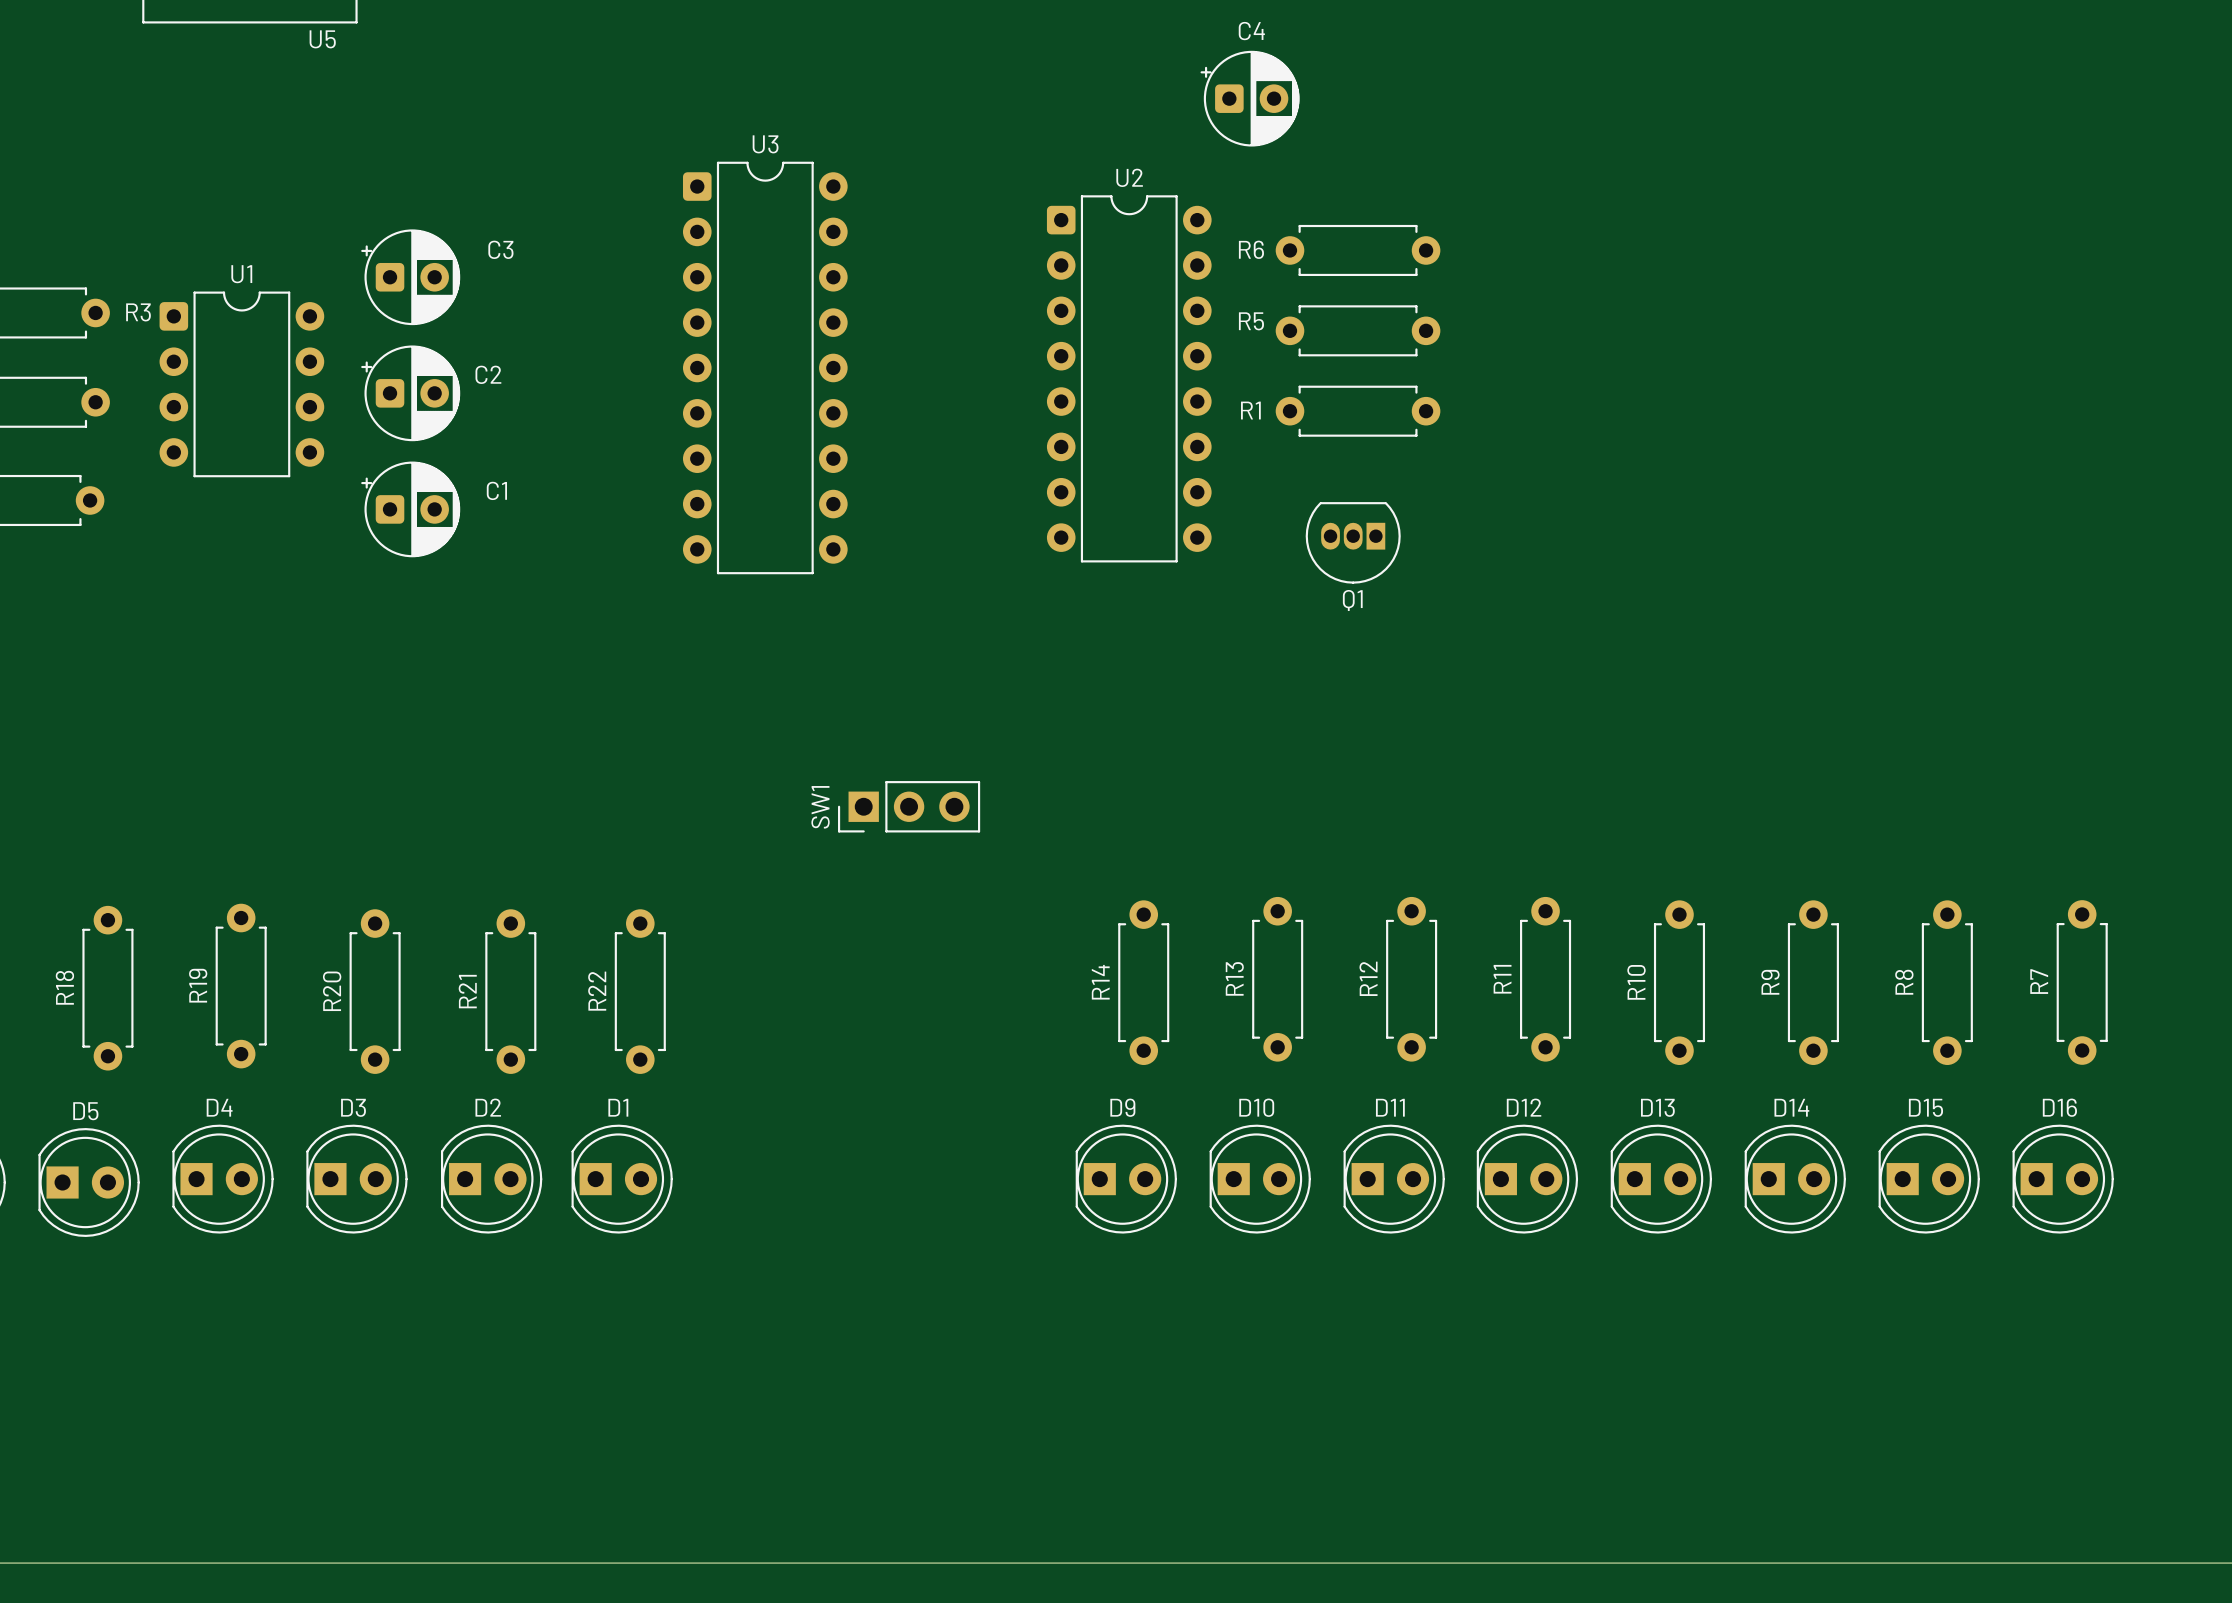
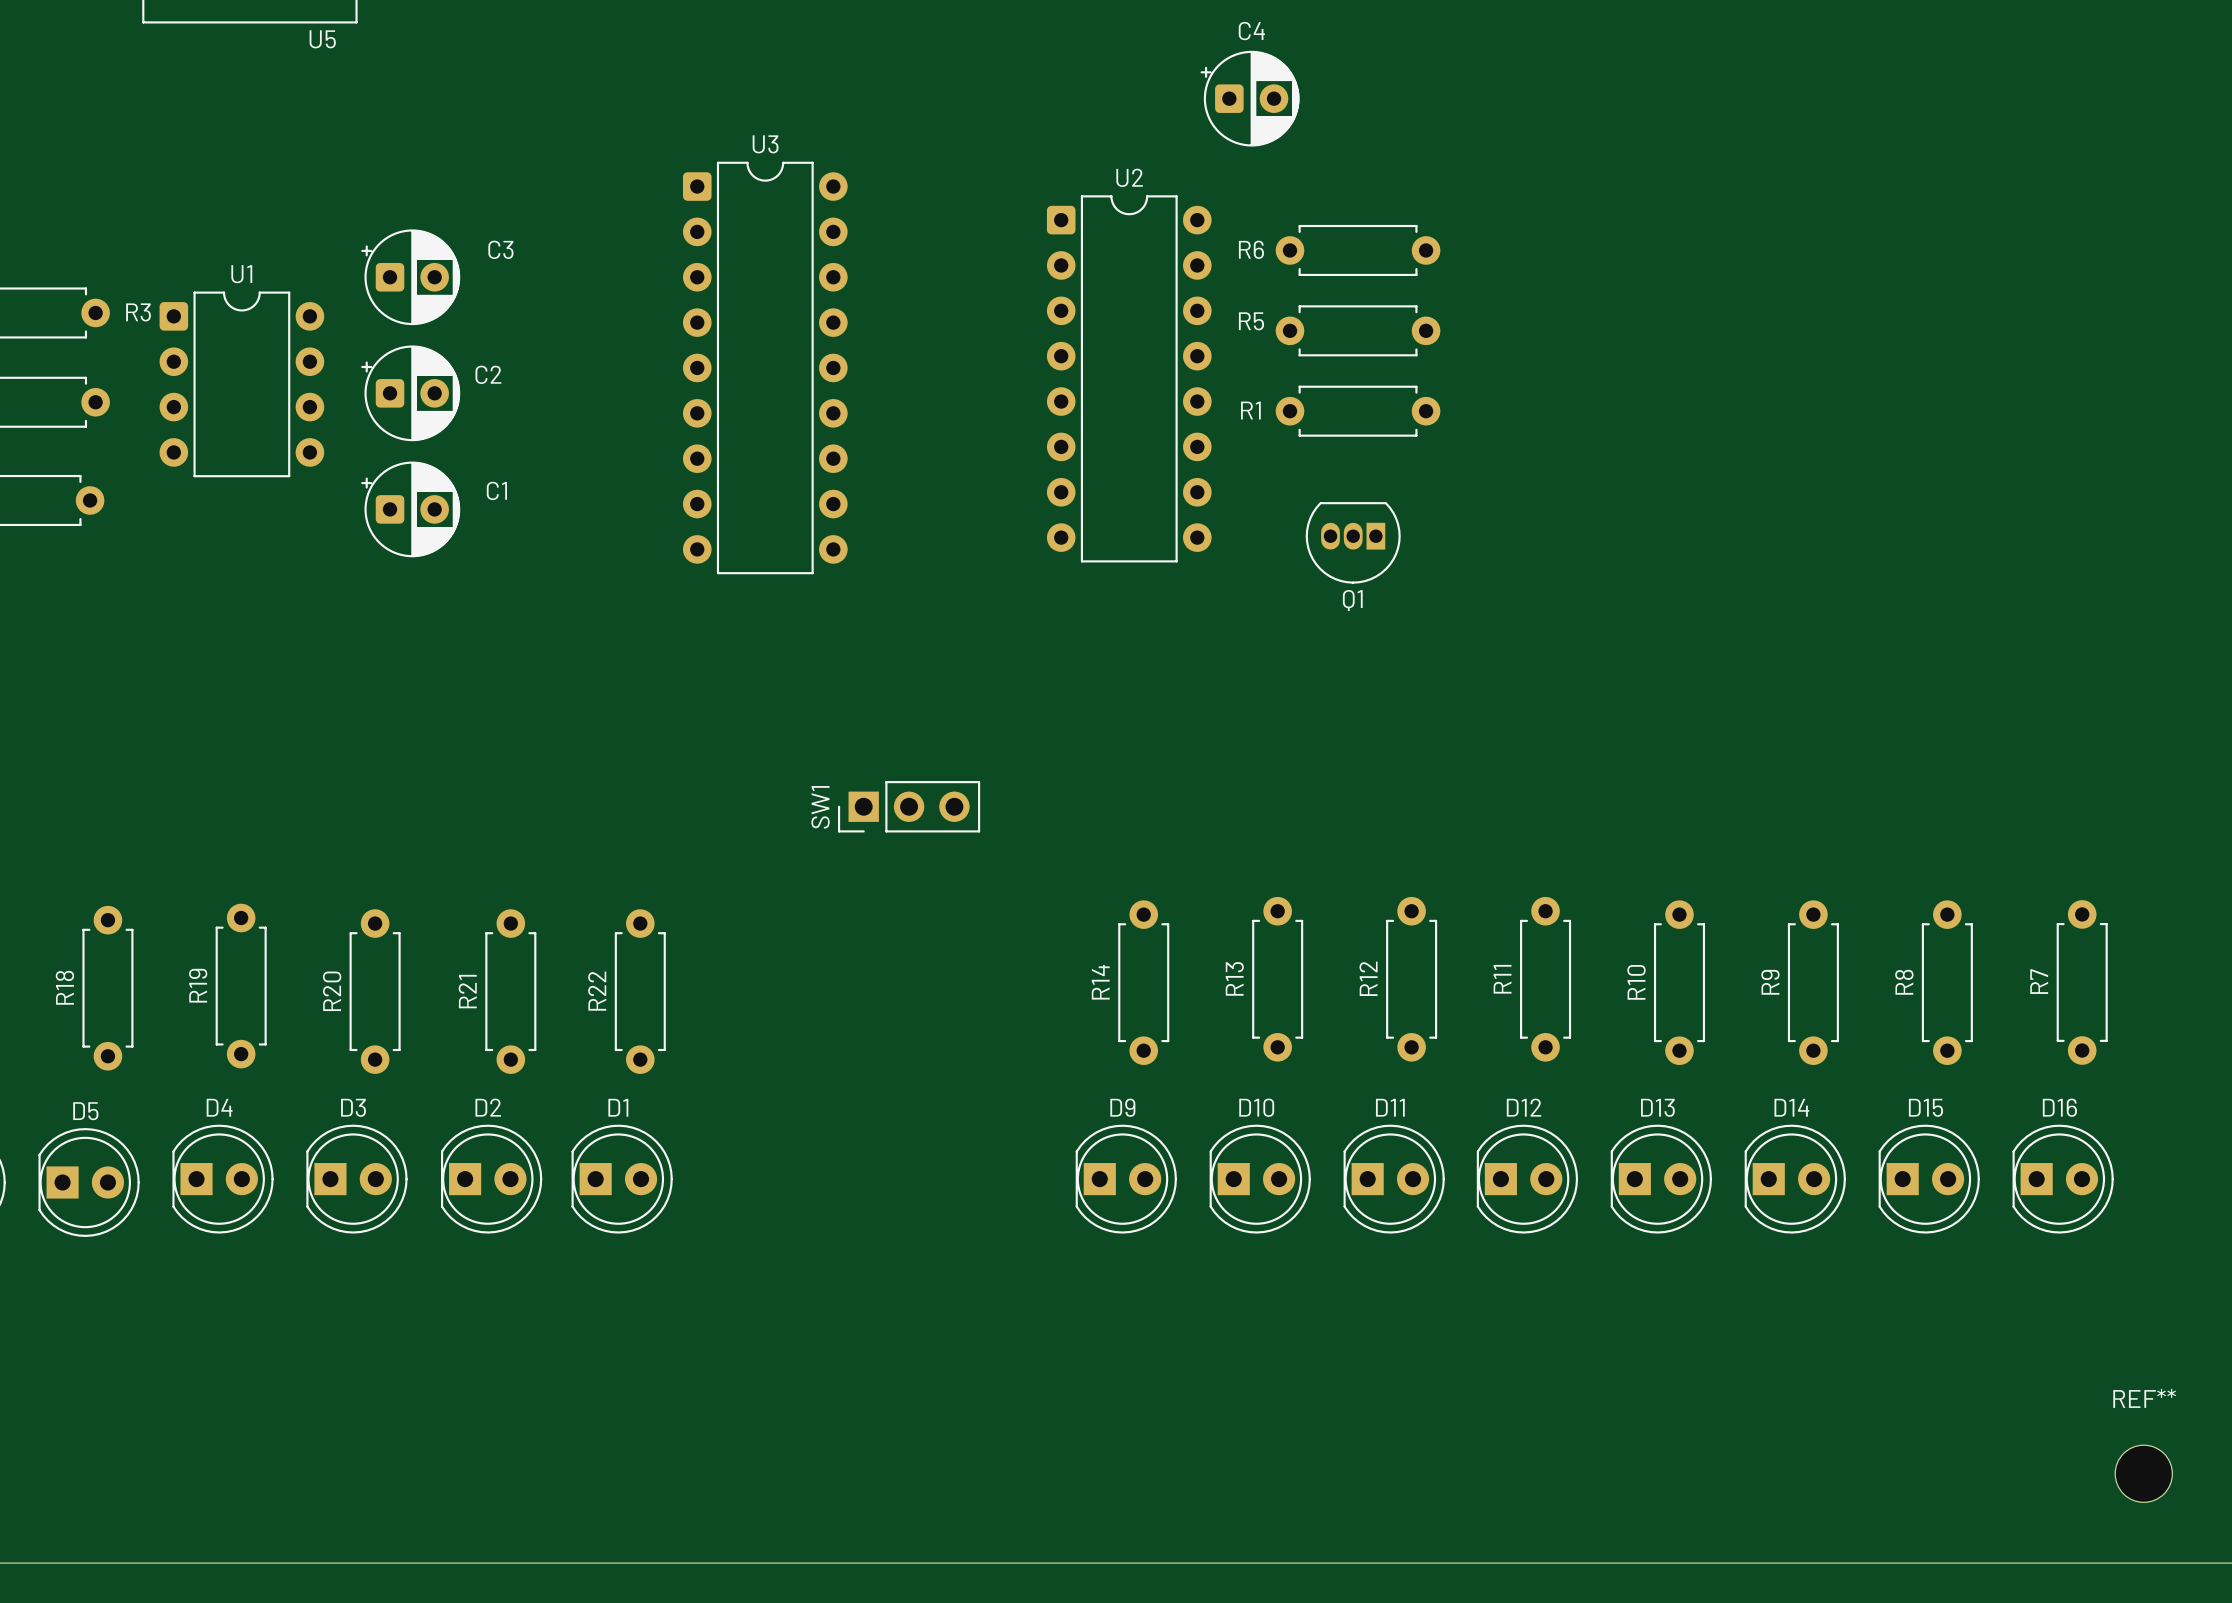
REF**: none -> (2143, 1473)

